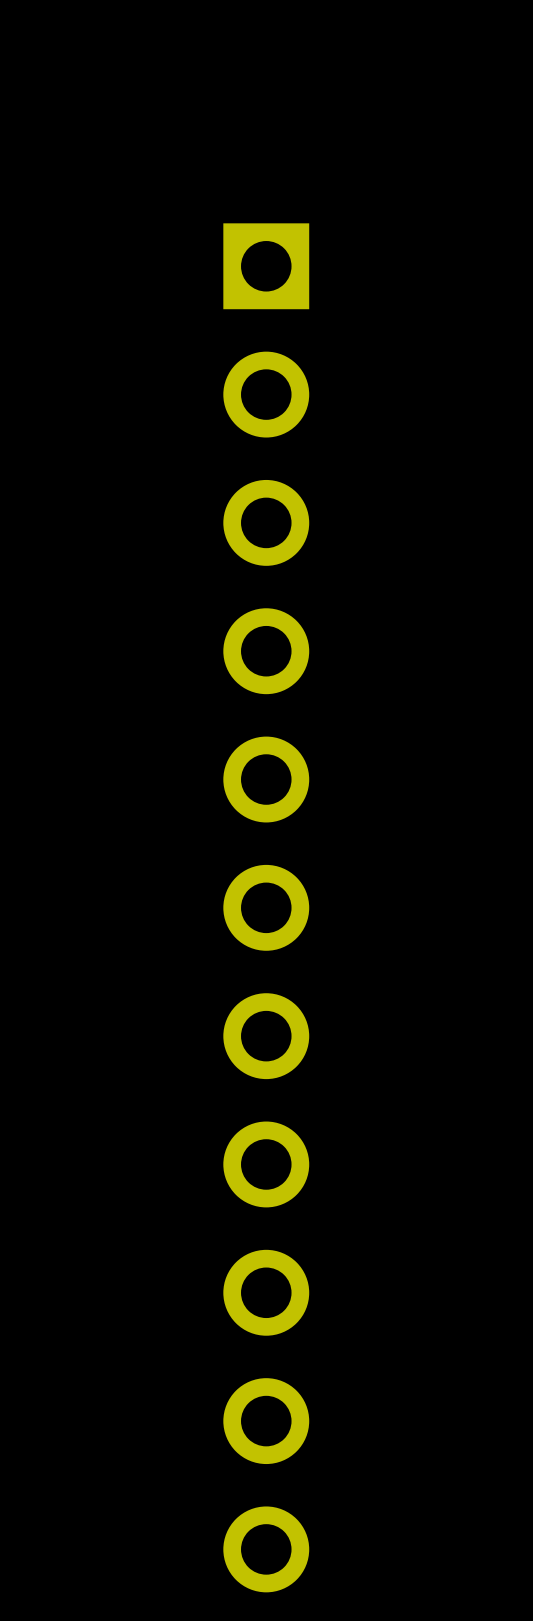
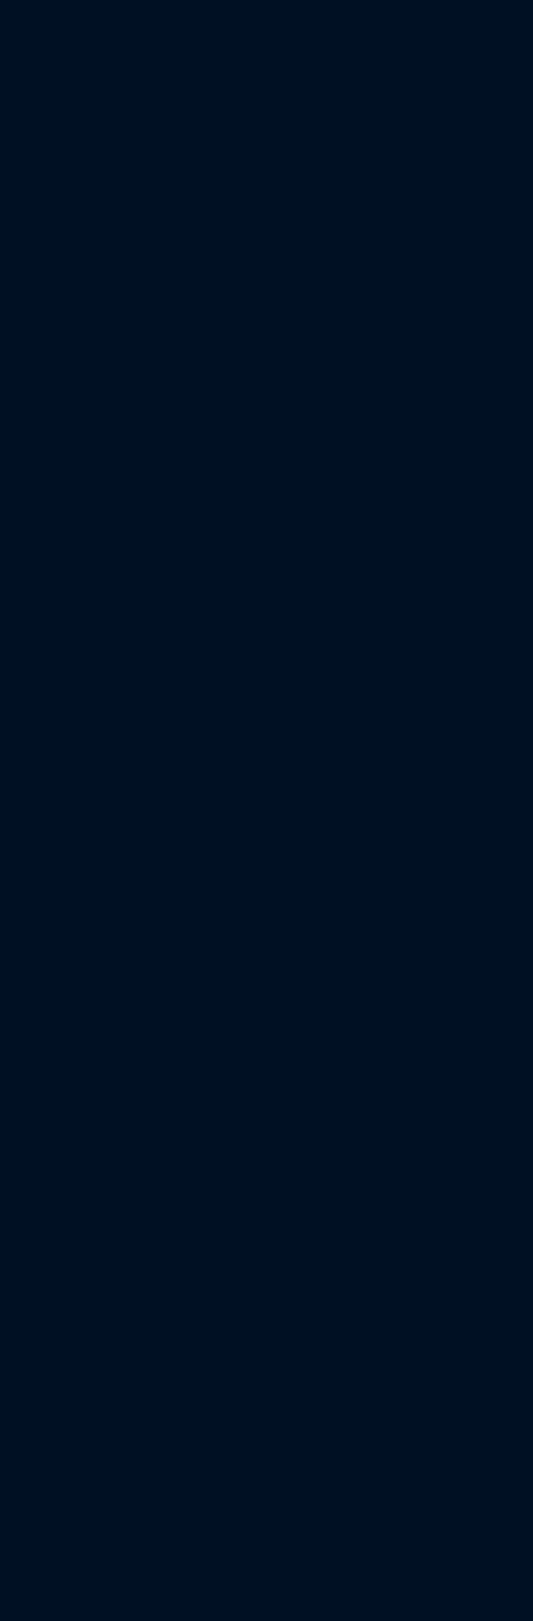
part: (266, 907) -> none

